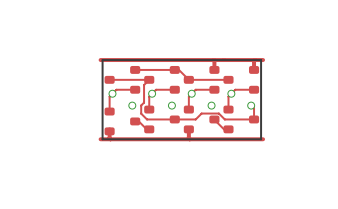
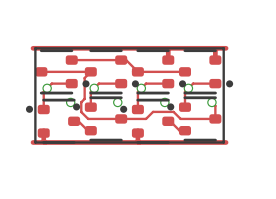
part footprint: [104, 65, 141, 94] -> [35, 49, 90, 95]
part footprint: [144, 65, 180, 94] -> [84, 49, 139, 95]
part footprint: [183, 65, 220, 94] -> [131, 49, 187, 95]
part footprint: [223, 65, 260, 94] -> [178, 49, 234, 95]
part footprint: [144, 105, 180, 134] -> [73, 96, 128, 142]
part footprint: [183, 105, 220, 134] -> [120, 98, 175, 144]
part footprint: [223, 105, 260, 134] -> [167, 96, 222, 142]
part footprint: [104, 107, 141, 136] -> [25, 98, 81, 144]

